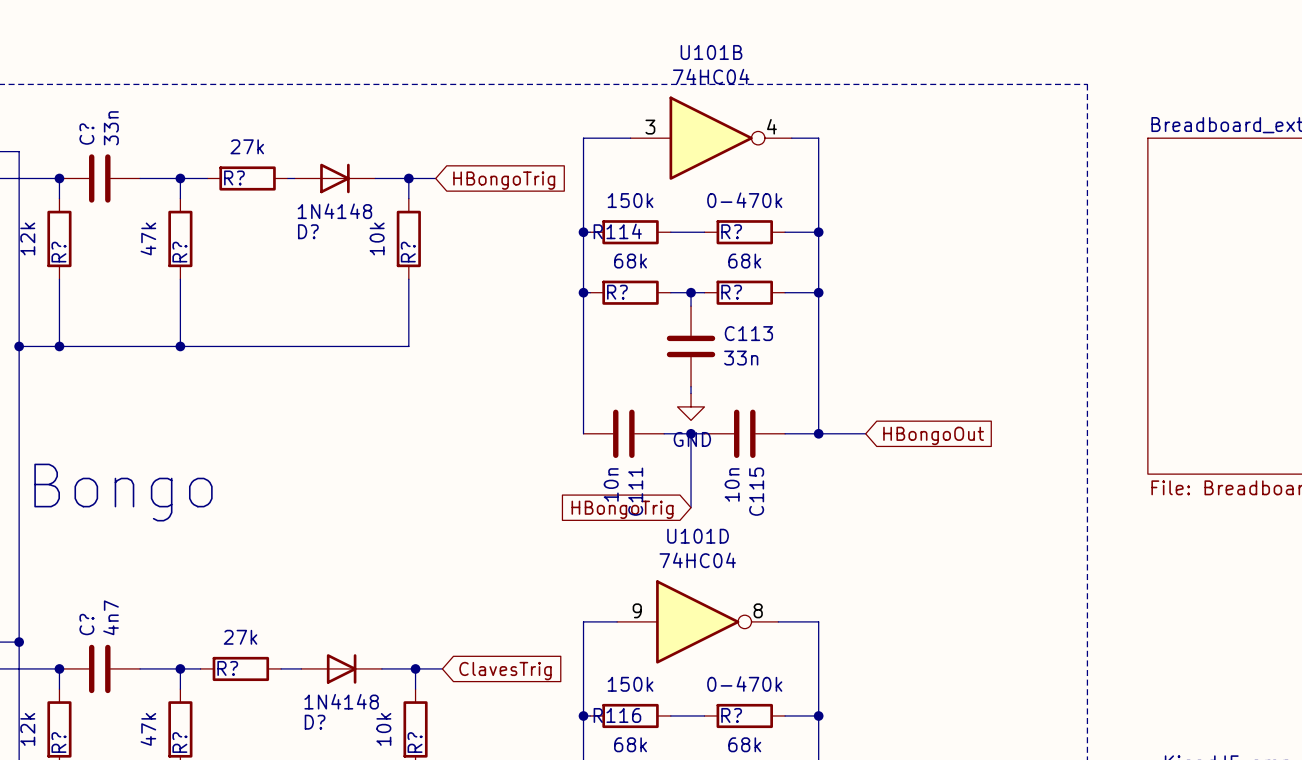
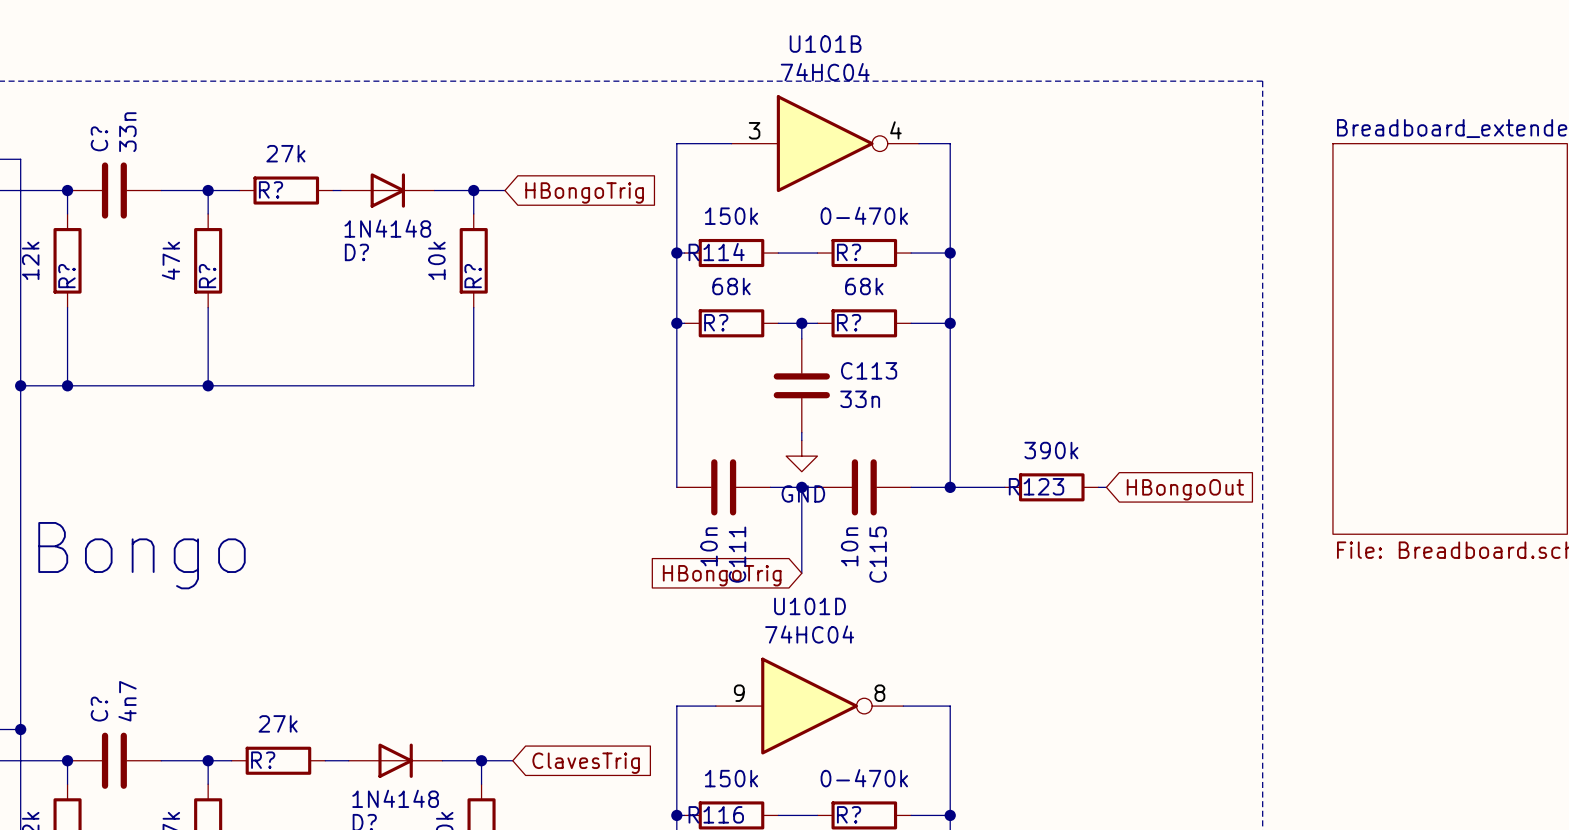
R123: none -> 390k (1051, 487)
wire: none -> (1098, 487) (1106, 487)
global label position: HBongoOut (933, 435) -> HBongoOut (1185, 489)

